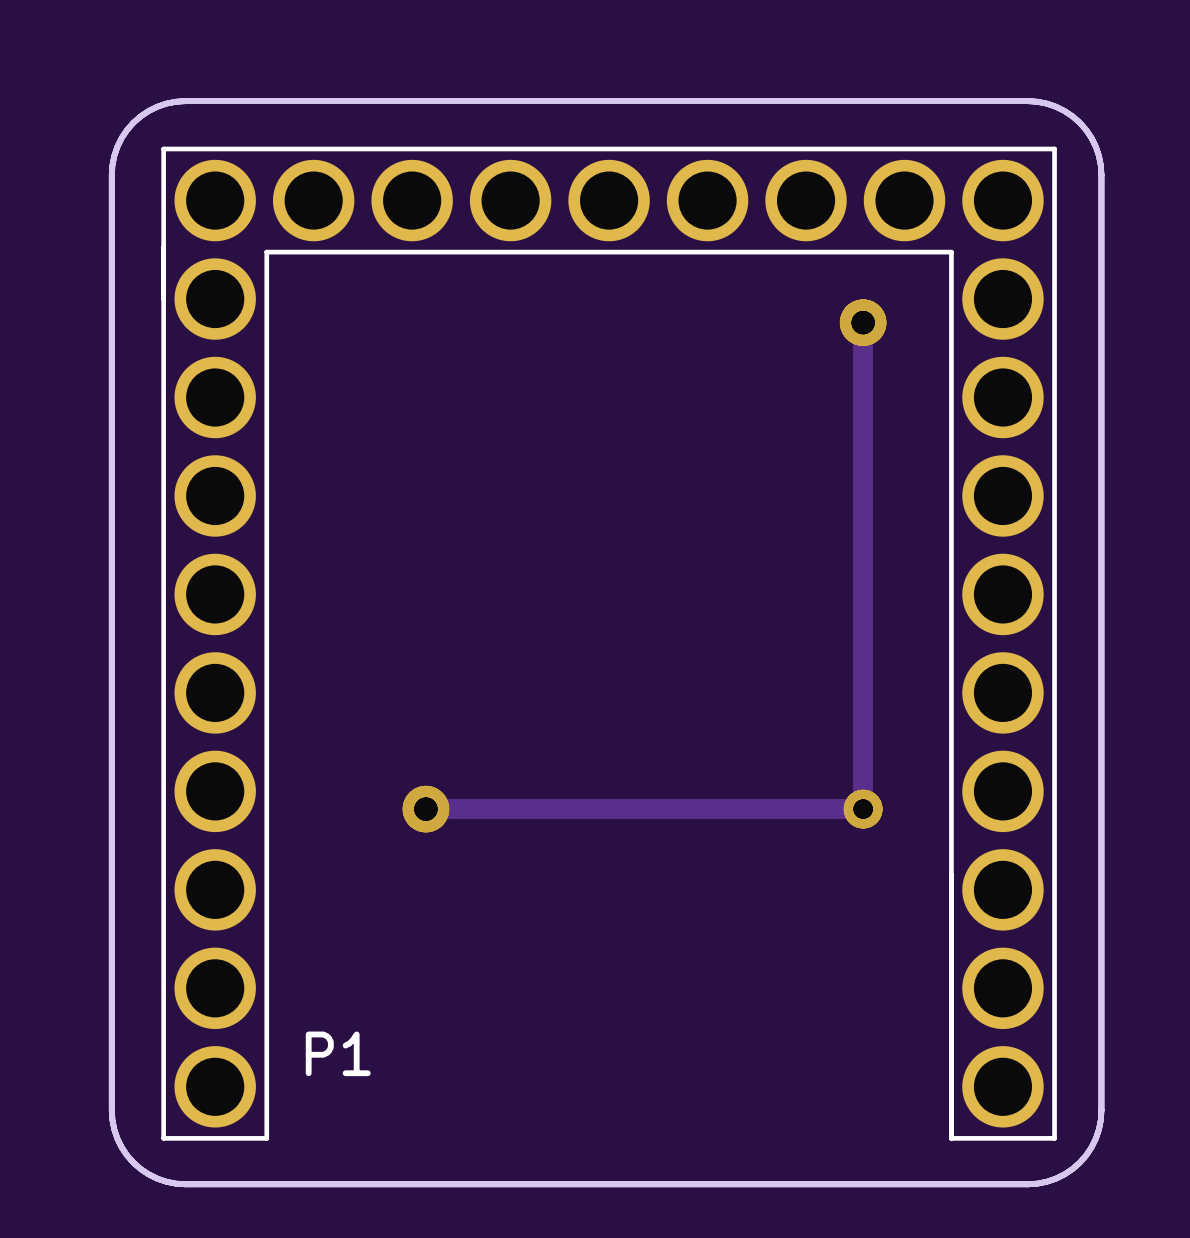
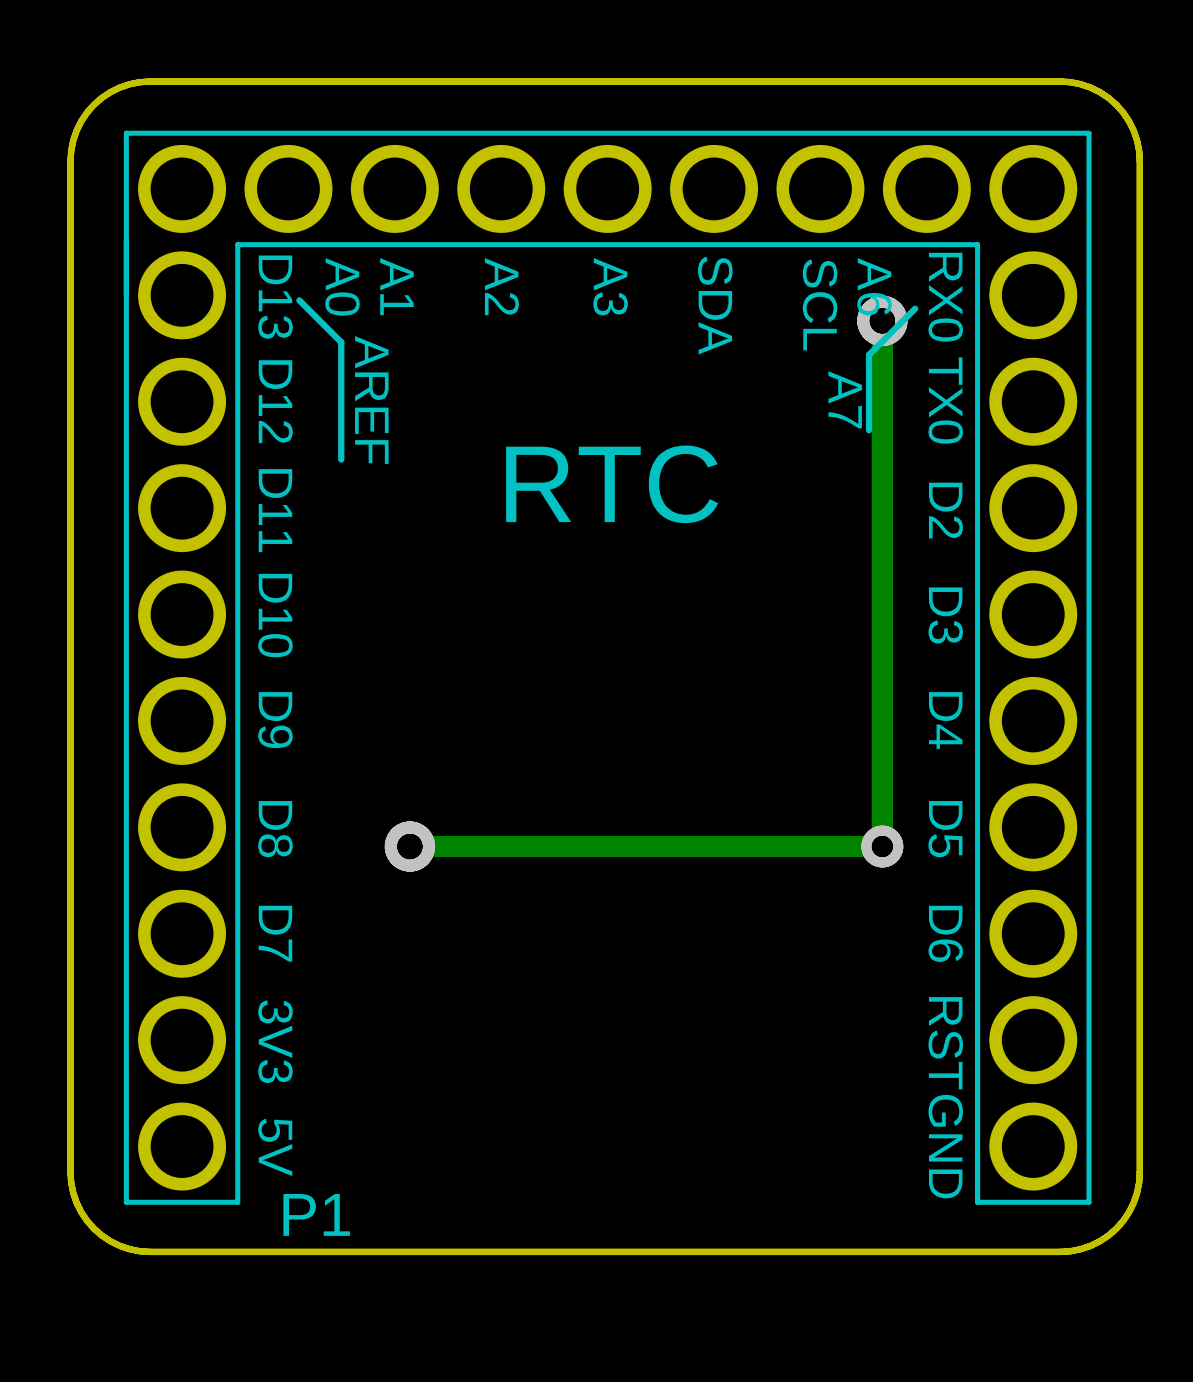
P1 footprint: [161, 146, 1057, 1141] -> [123, 130, 1092, 1205]
text: none -> RTC (612, 484)
P1 name position: P1 (338, 1053) -> P1 (316, 1214)

